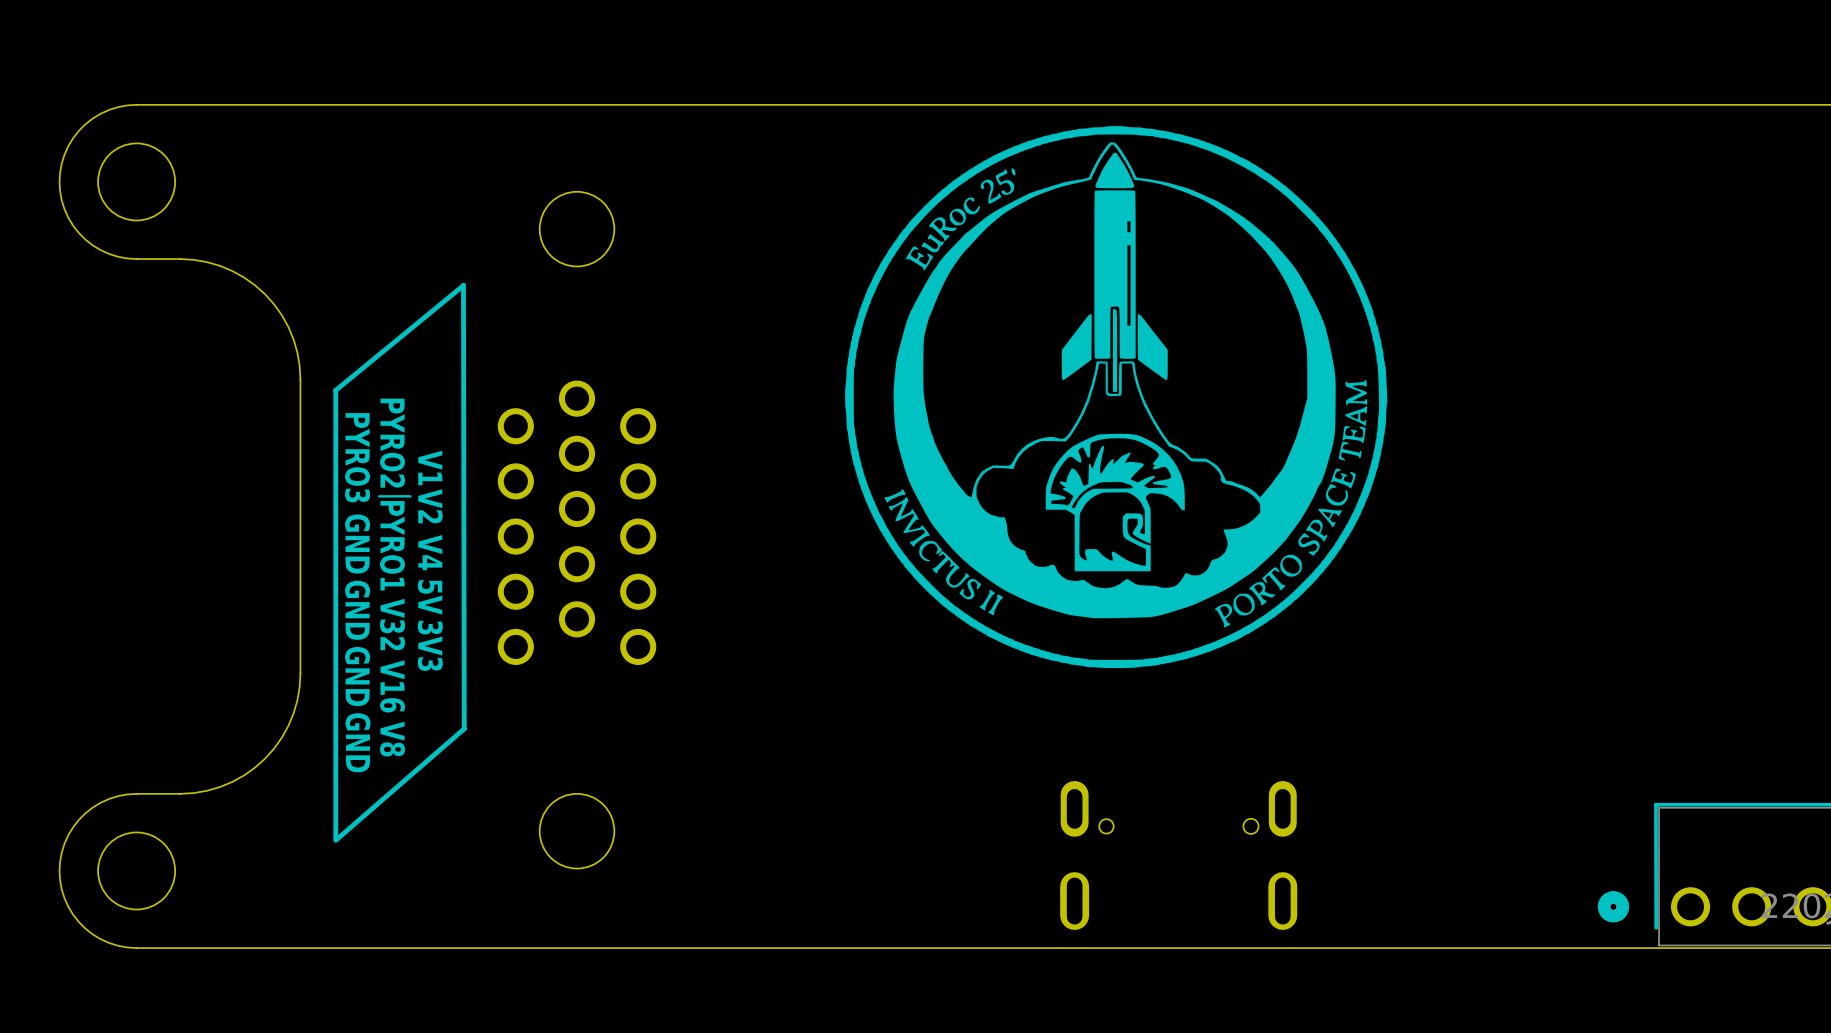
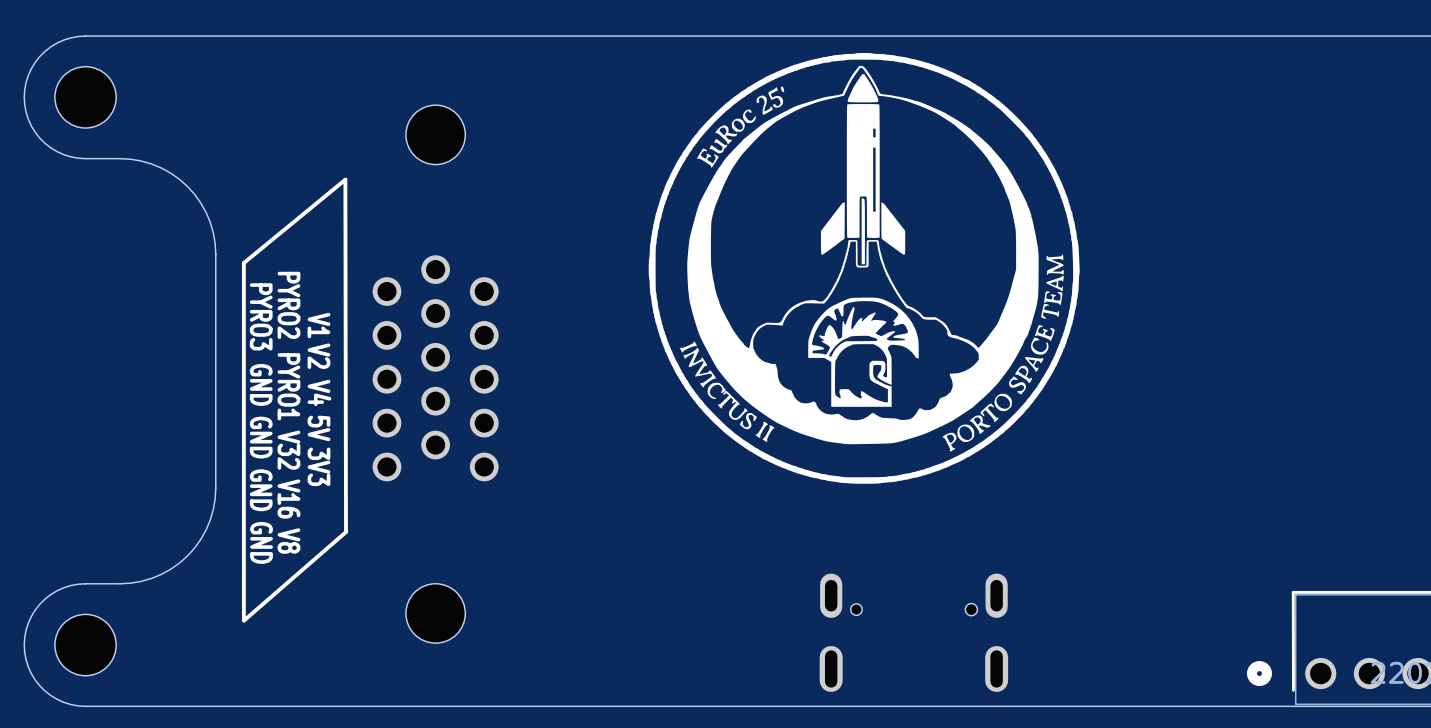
line: (410, 496) (379, 496) -> none

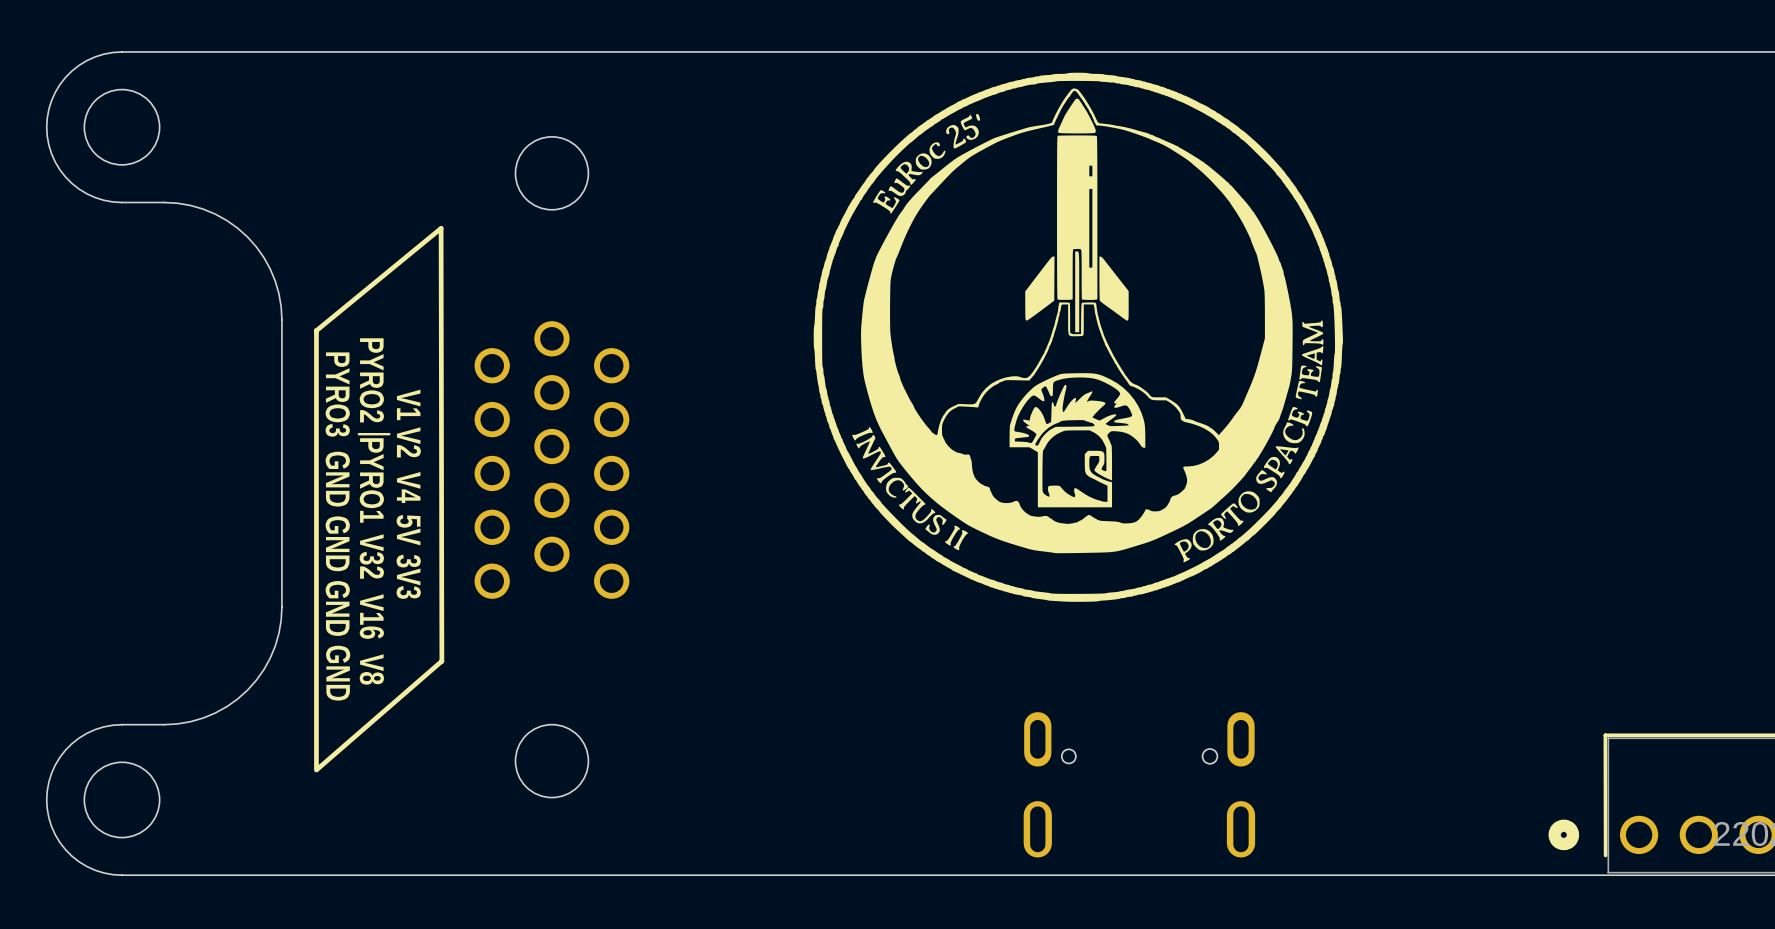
line: none -> (389, 434) (358, 434)

